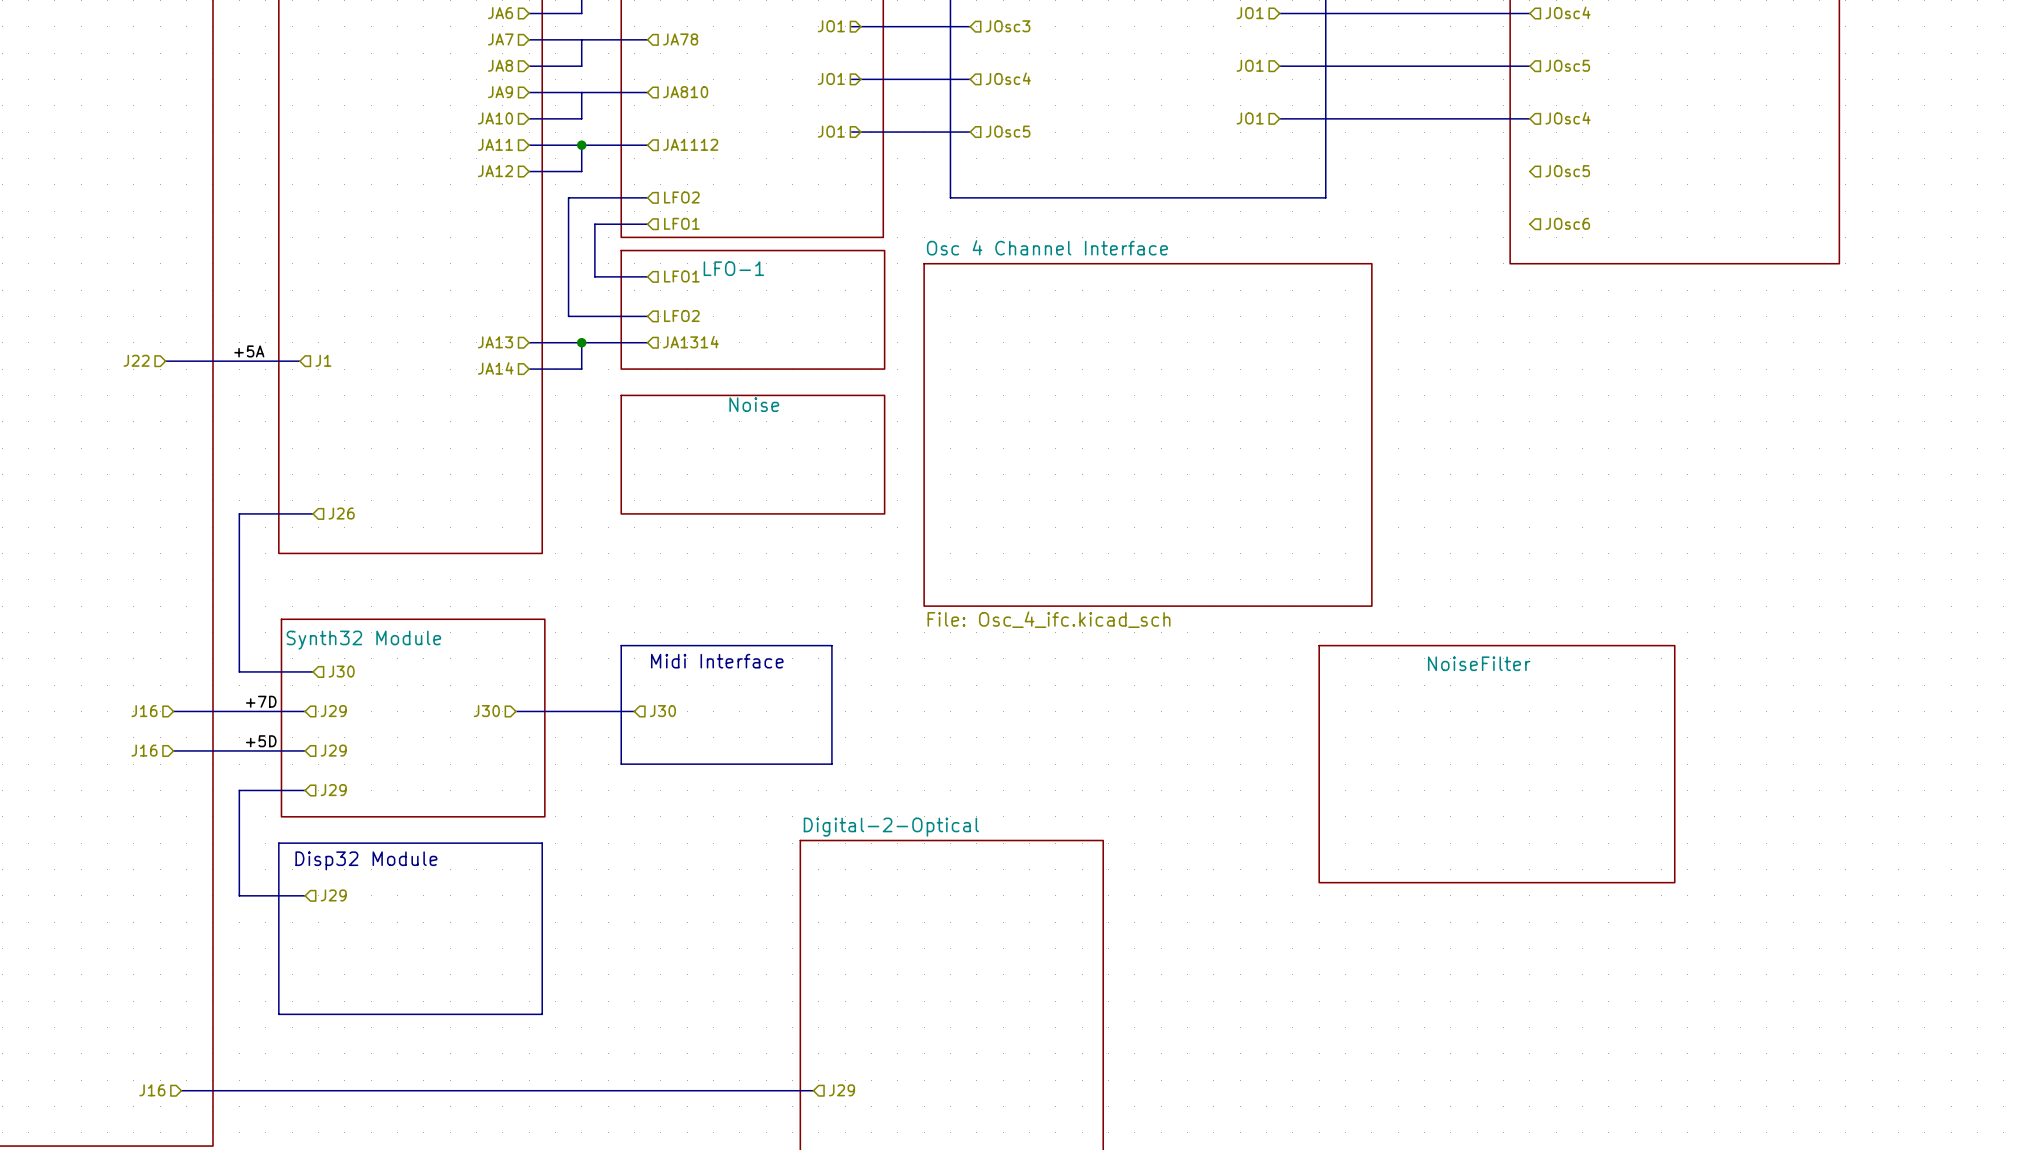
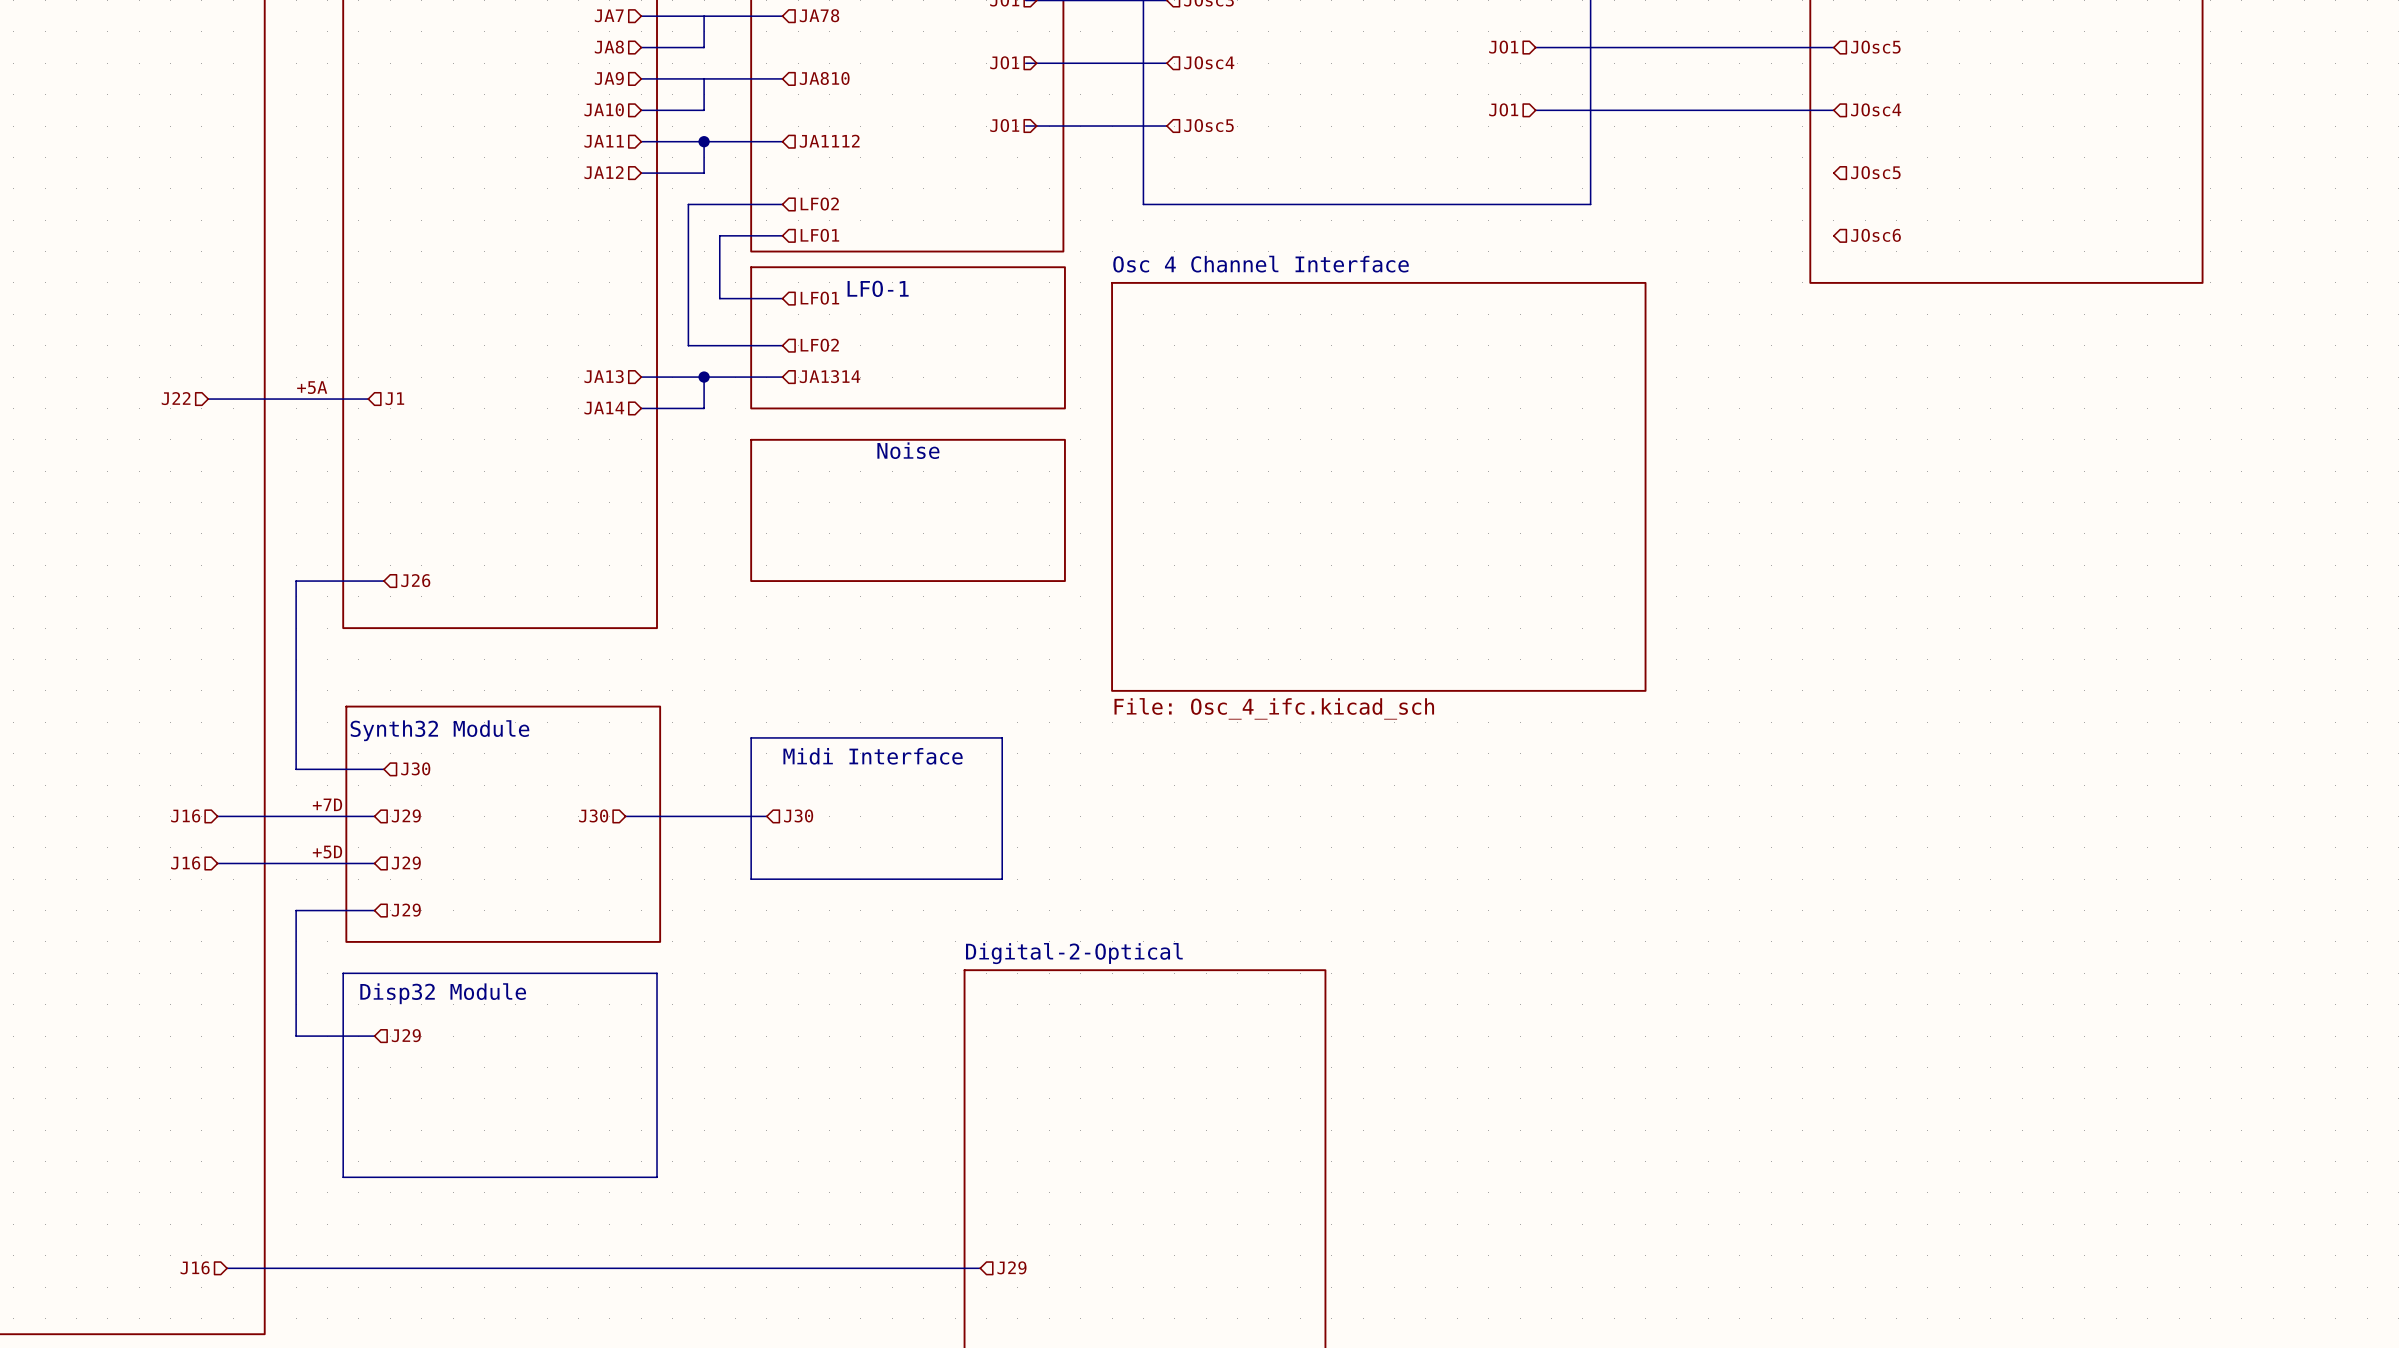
sheet NoiseFilter: (1496, 764) -> none

